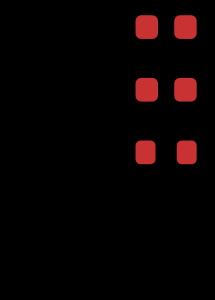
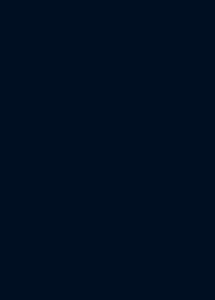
part: (166, 27) -> none
part: (166, 89) -> none
part: (166, 152) -> none

